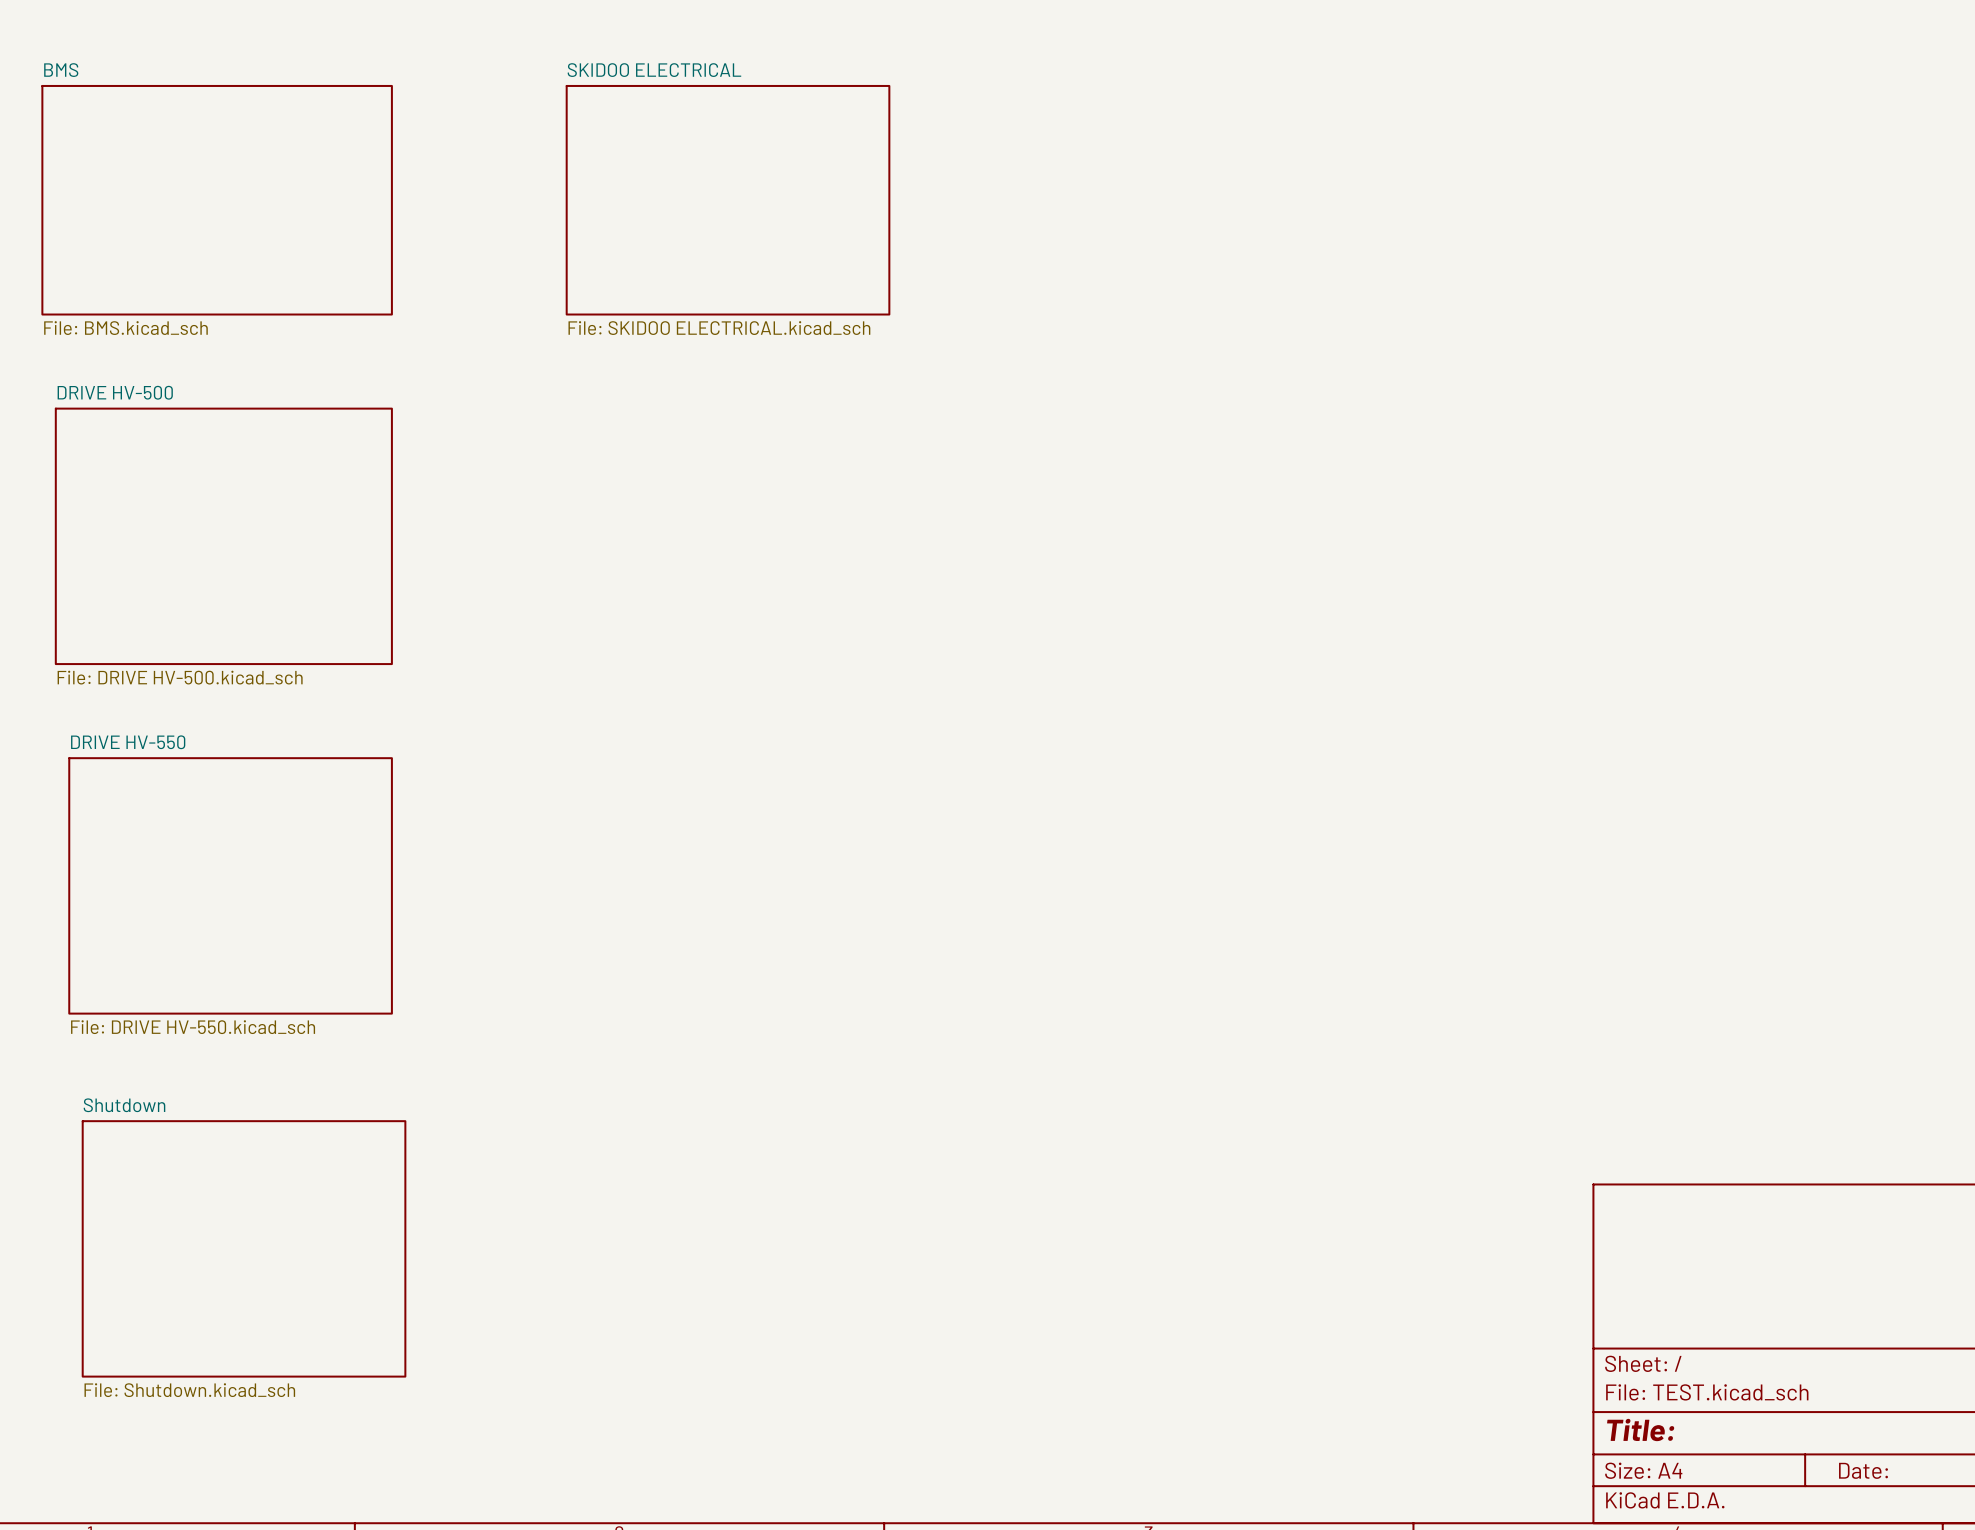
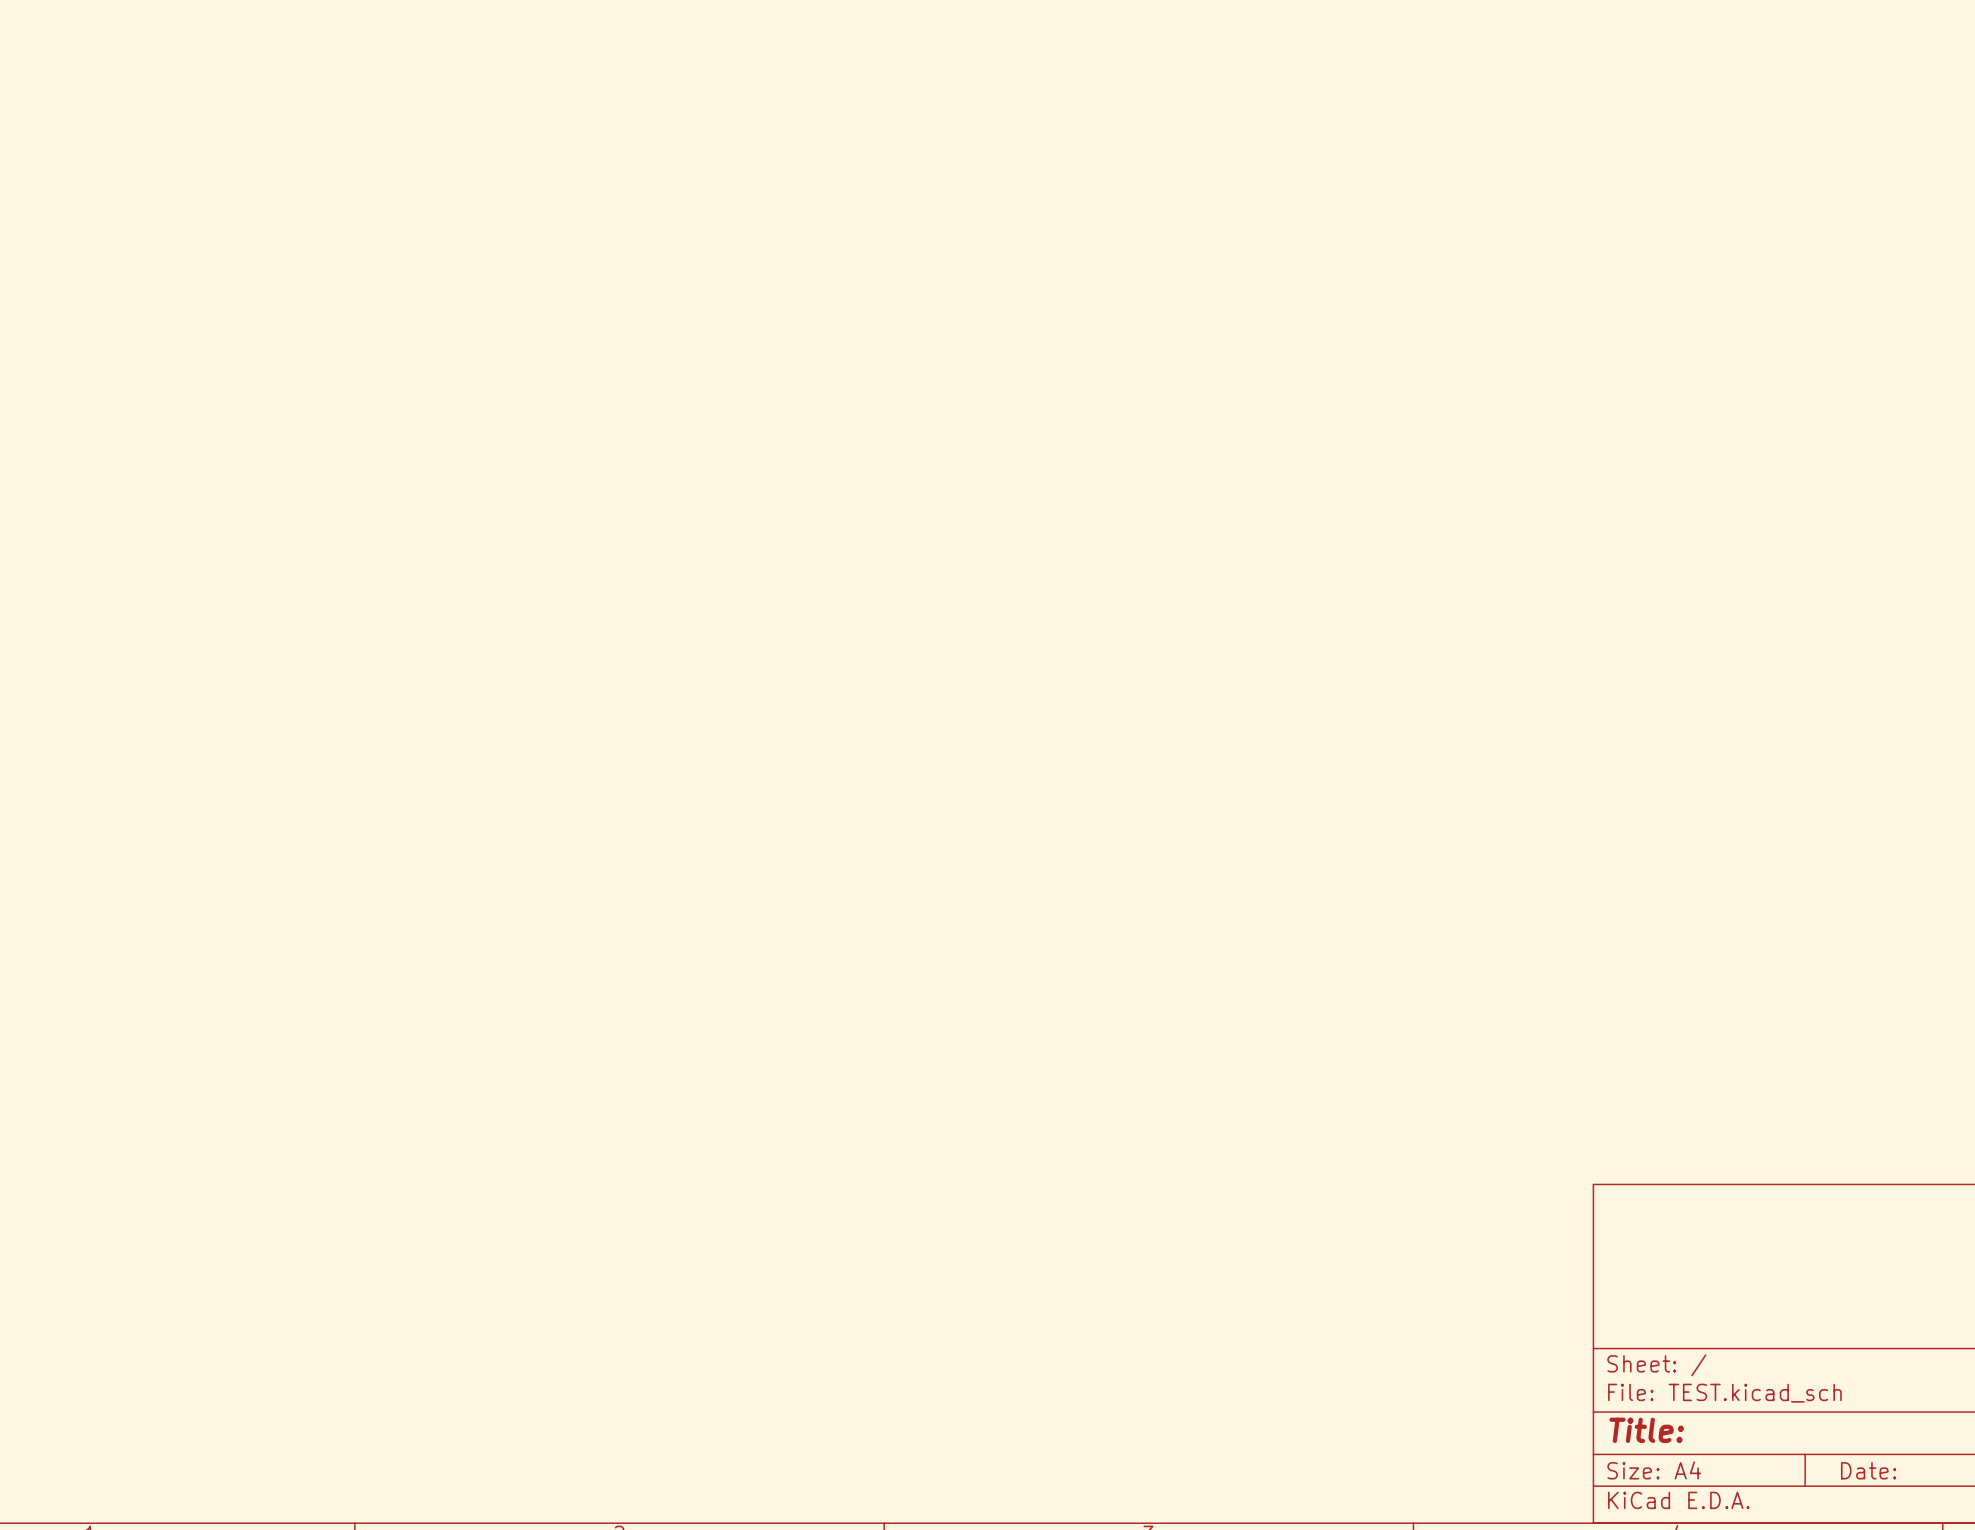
sheet BMS: File: BMS.kicad_sch (217, 200) -> none
sheet SKIDOO ELECTRICAL: File: SKIDOO ELECTRICAL.kicad_sch (728, 200) -> none
sheet DRIVE HV-500: File: DRIVE HV-500.kicad_sch (223, 536) -> none
sheet DRIVE HV-550: File: DRIVE HV-550.kicad_sch (230, 885) -> none
sheet Shutdown: File: Shutdown.kicad_sch (244, 1248) -> none

